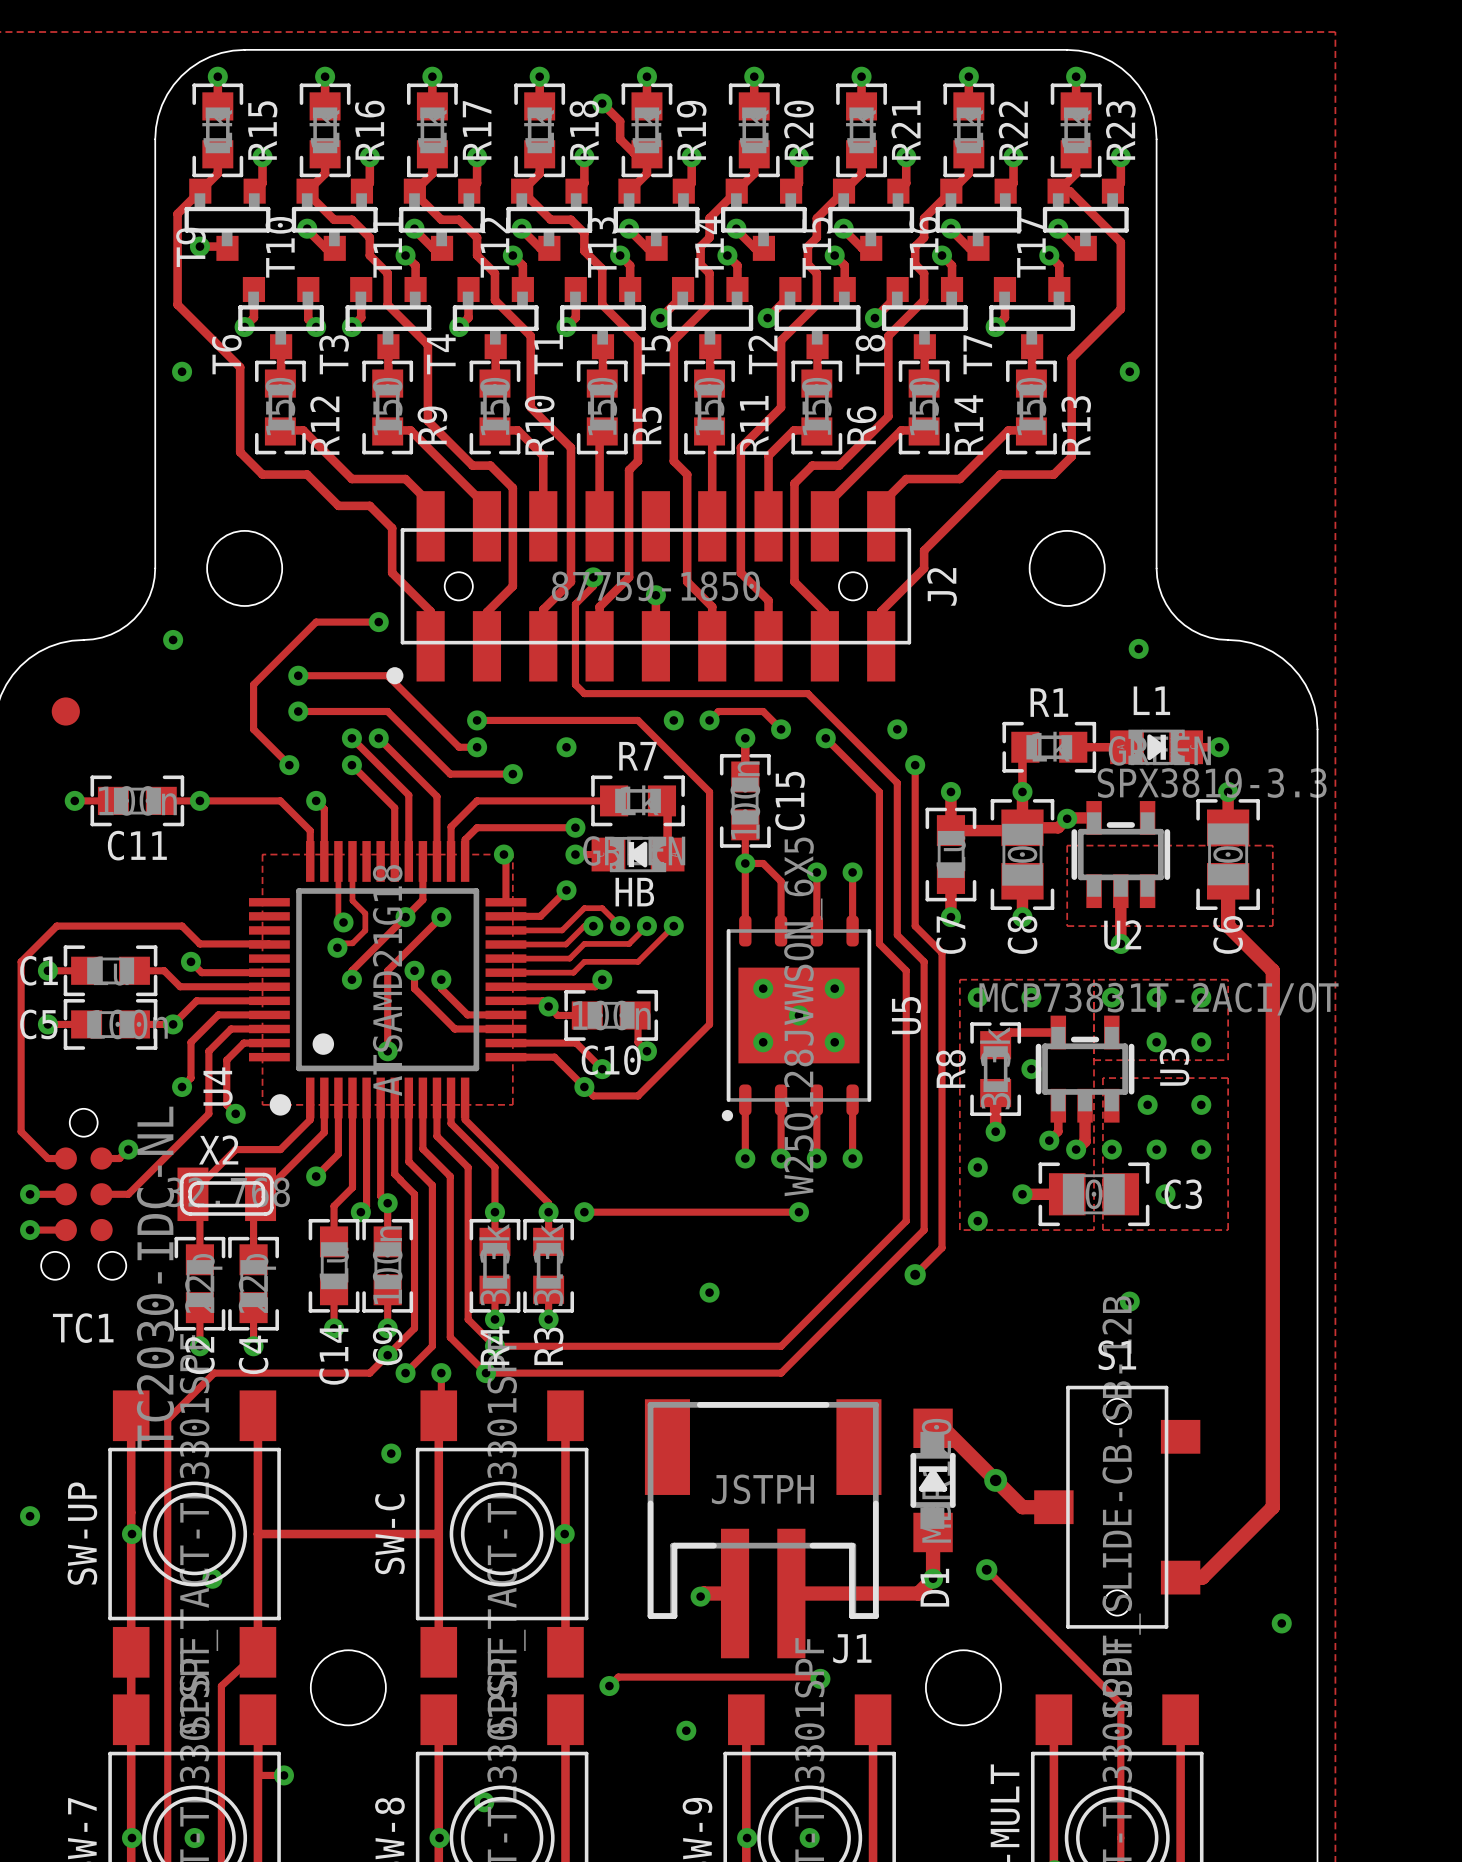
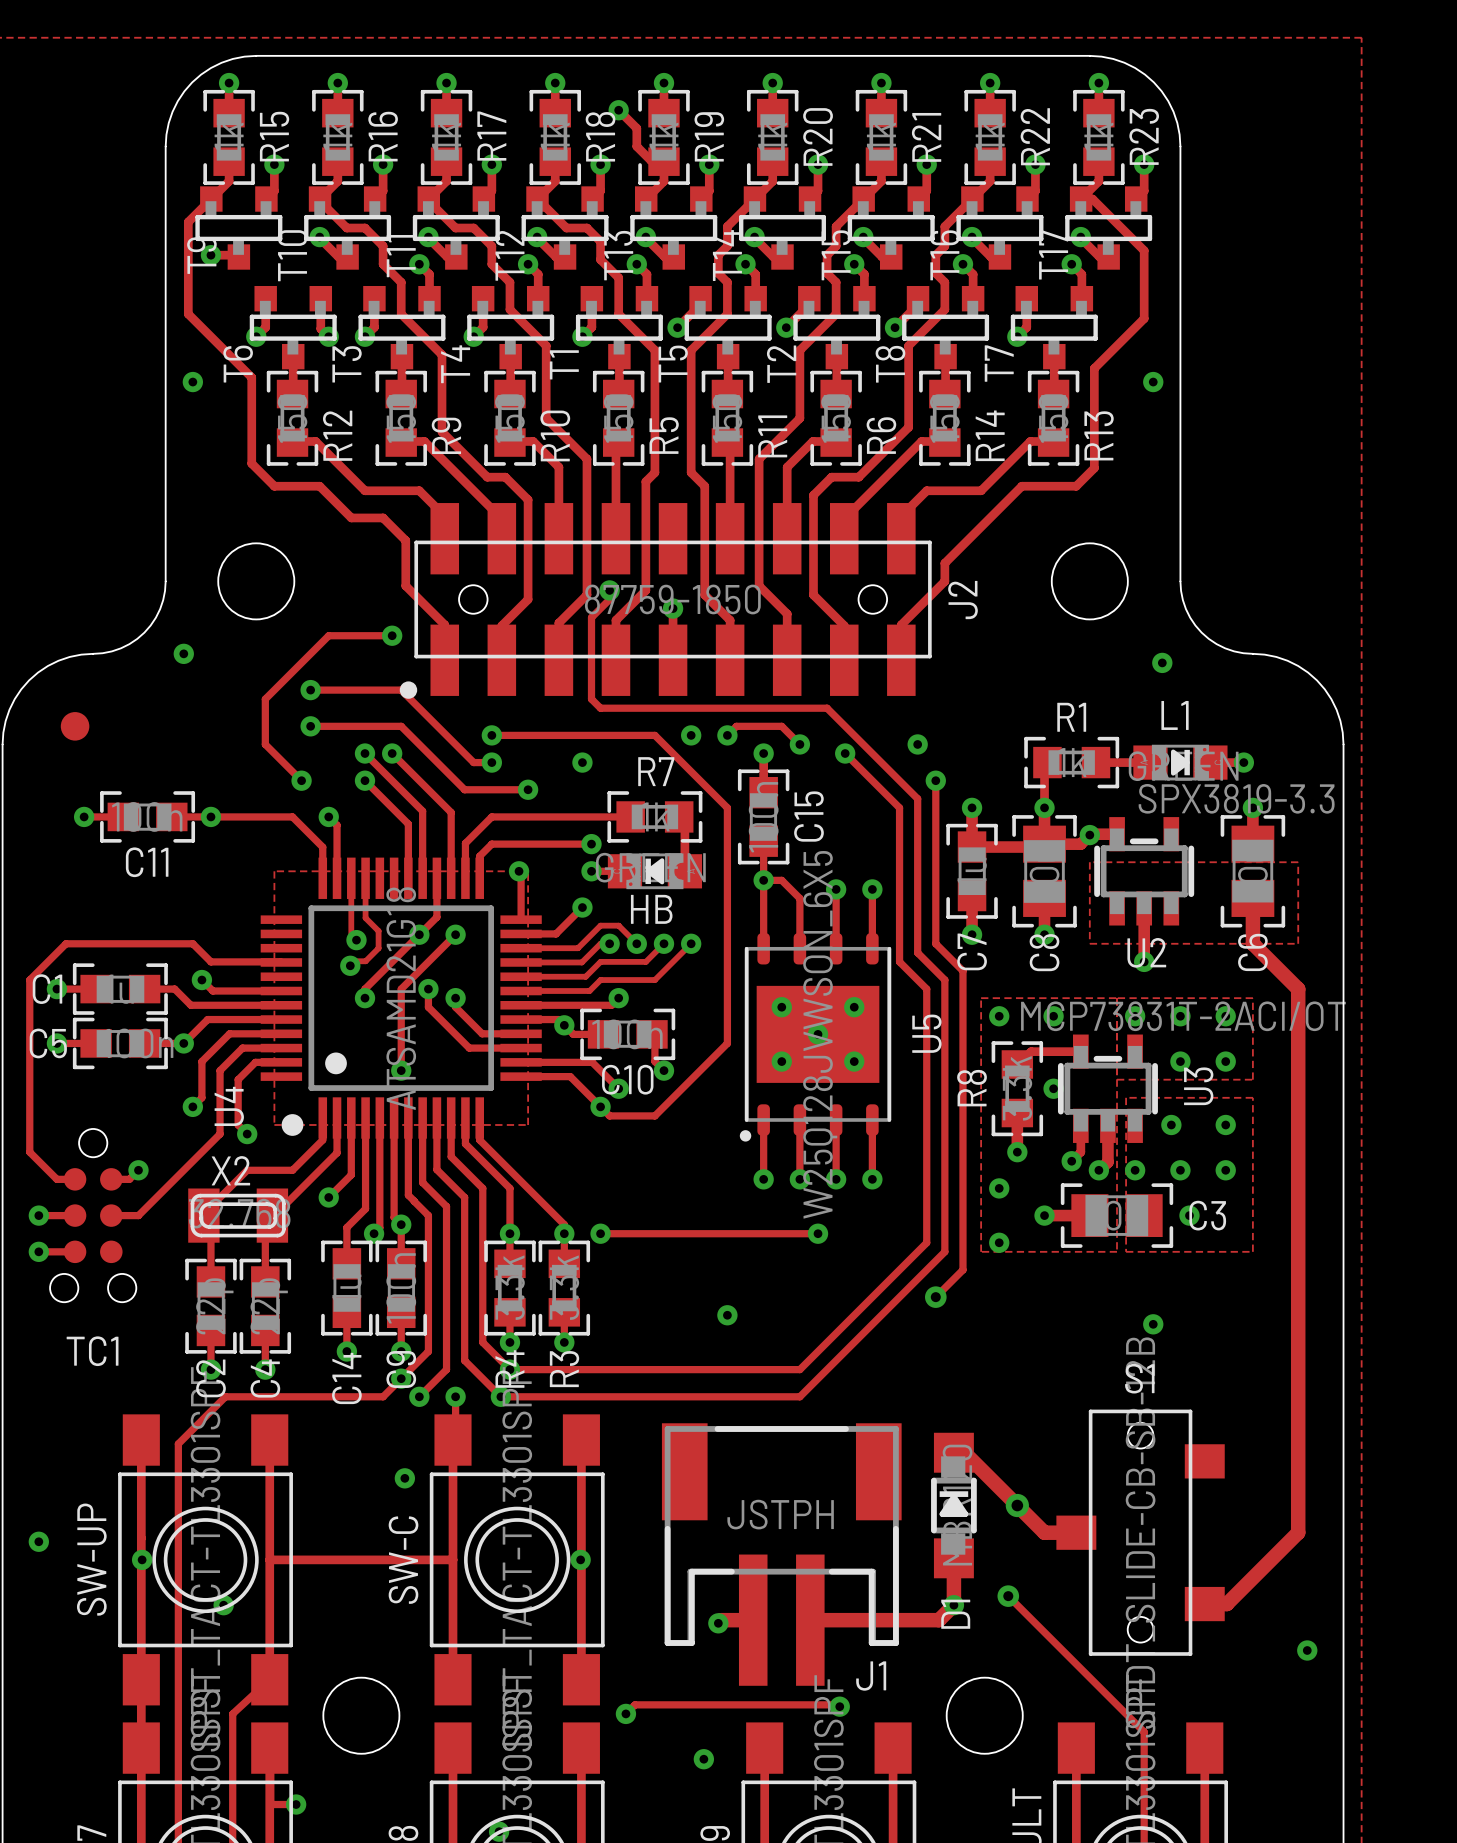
TC1 value: TC2030-IDC-NL (155, 1278) -> none

